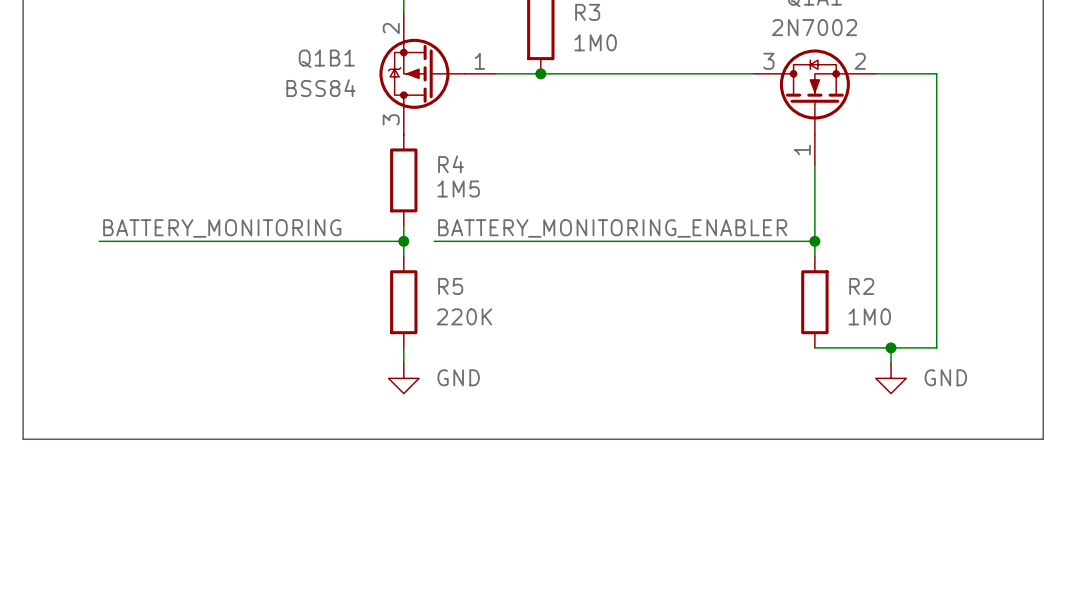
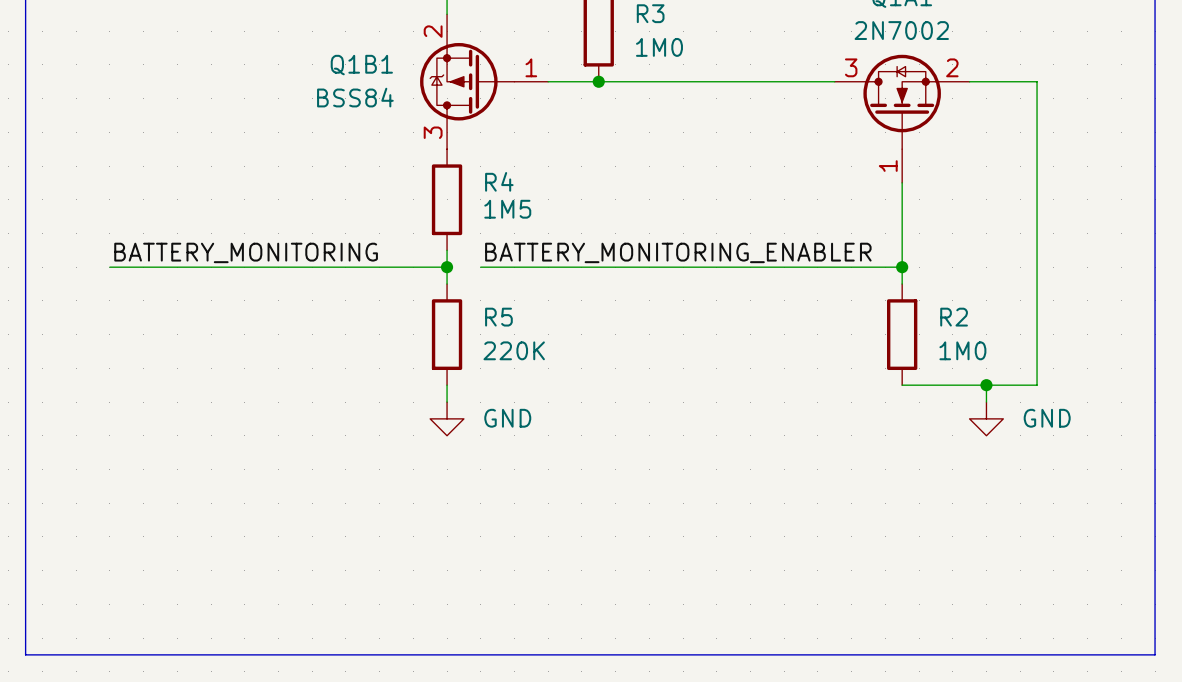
line: (23, 439) (1043, 439) -> (25, 486) (25, 654) (1155, 654) (1155, 486)

